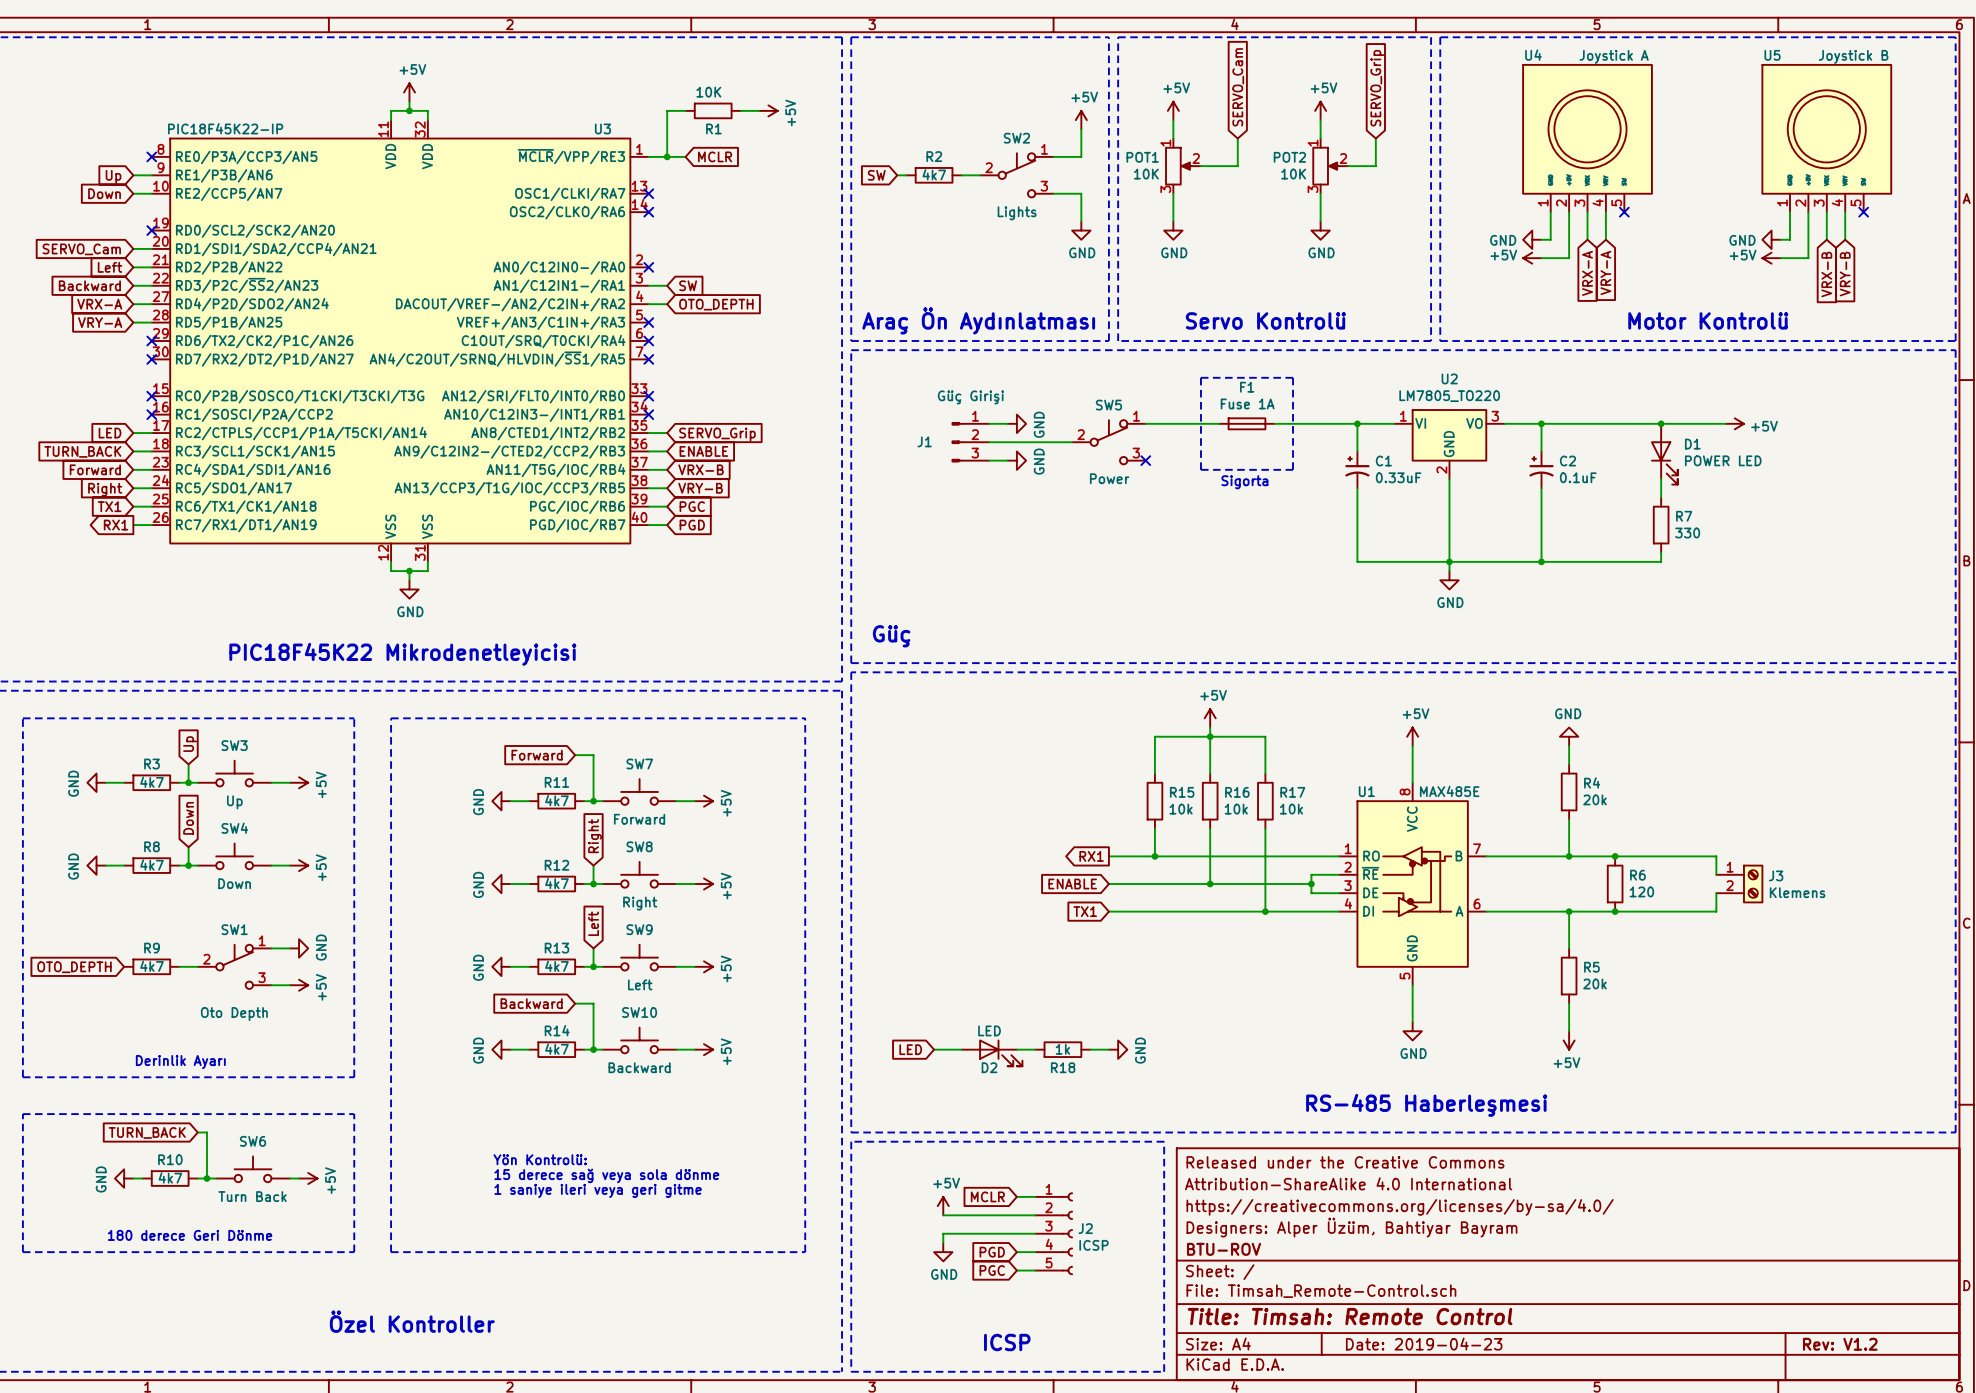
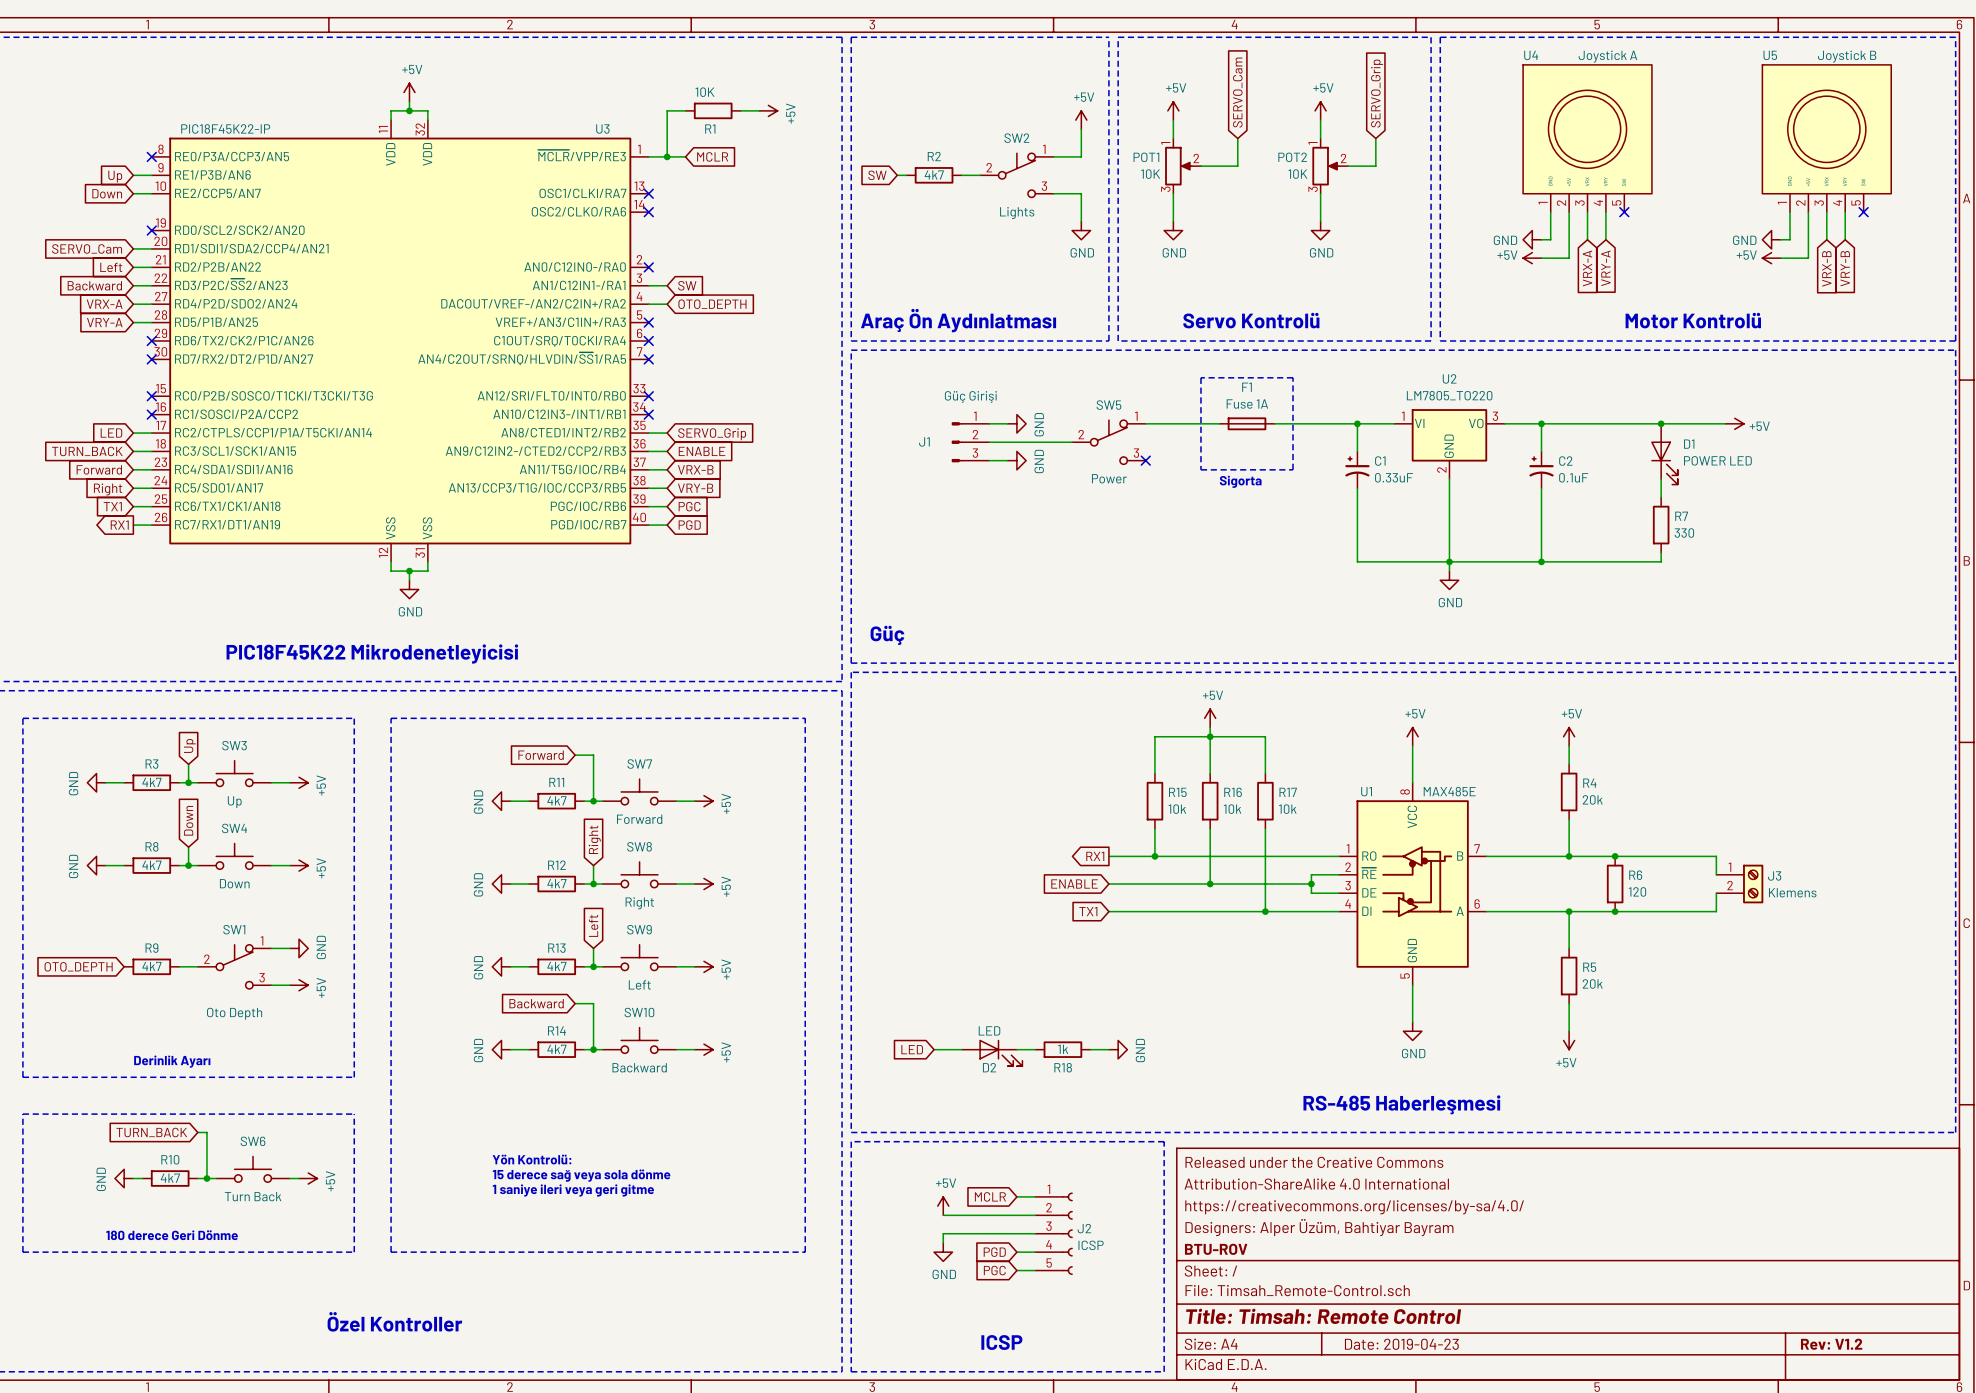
power symbol: GND (1569, 736) -> +5V (1569, 736)

